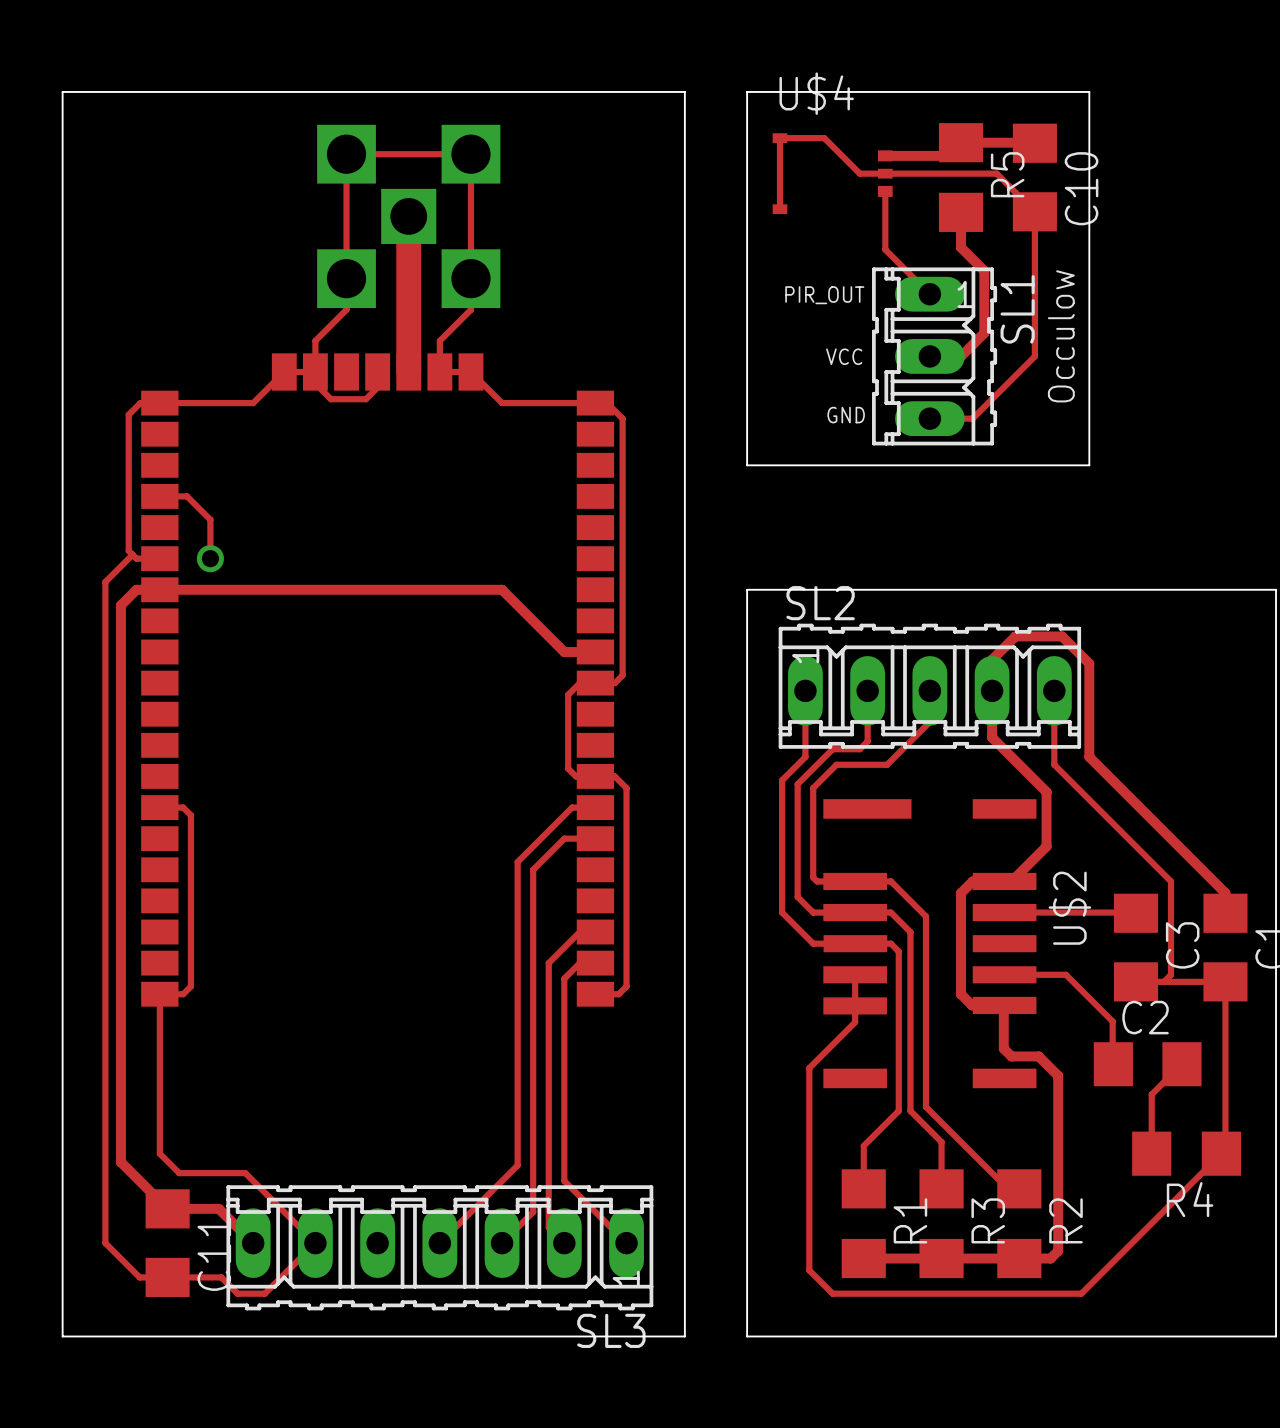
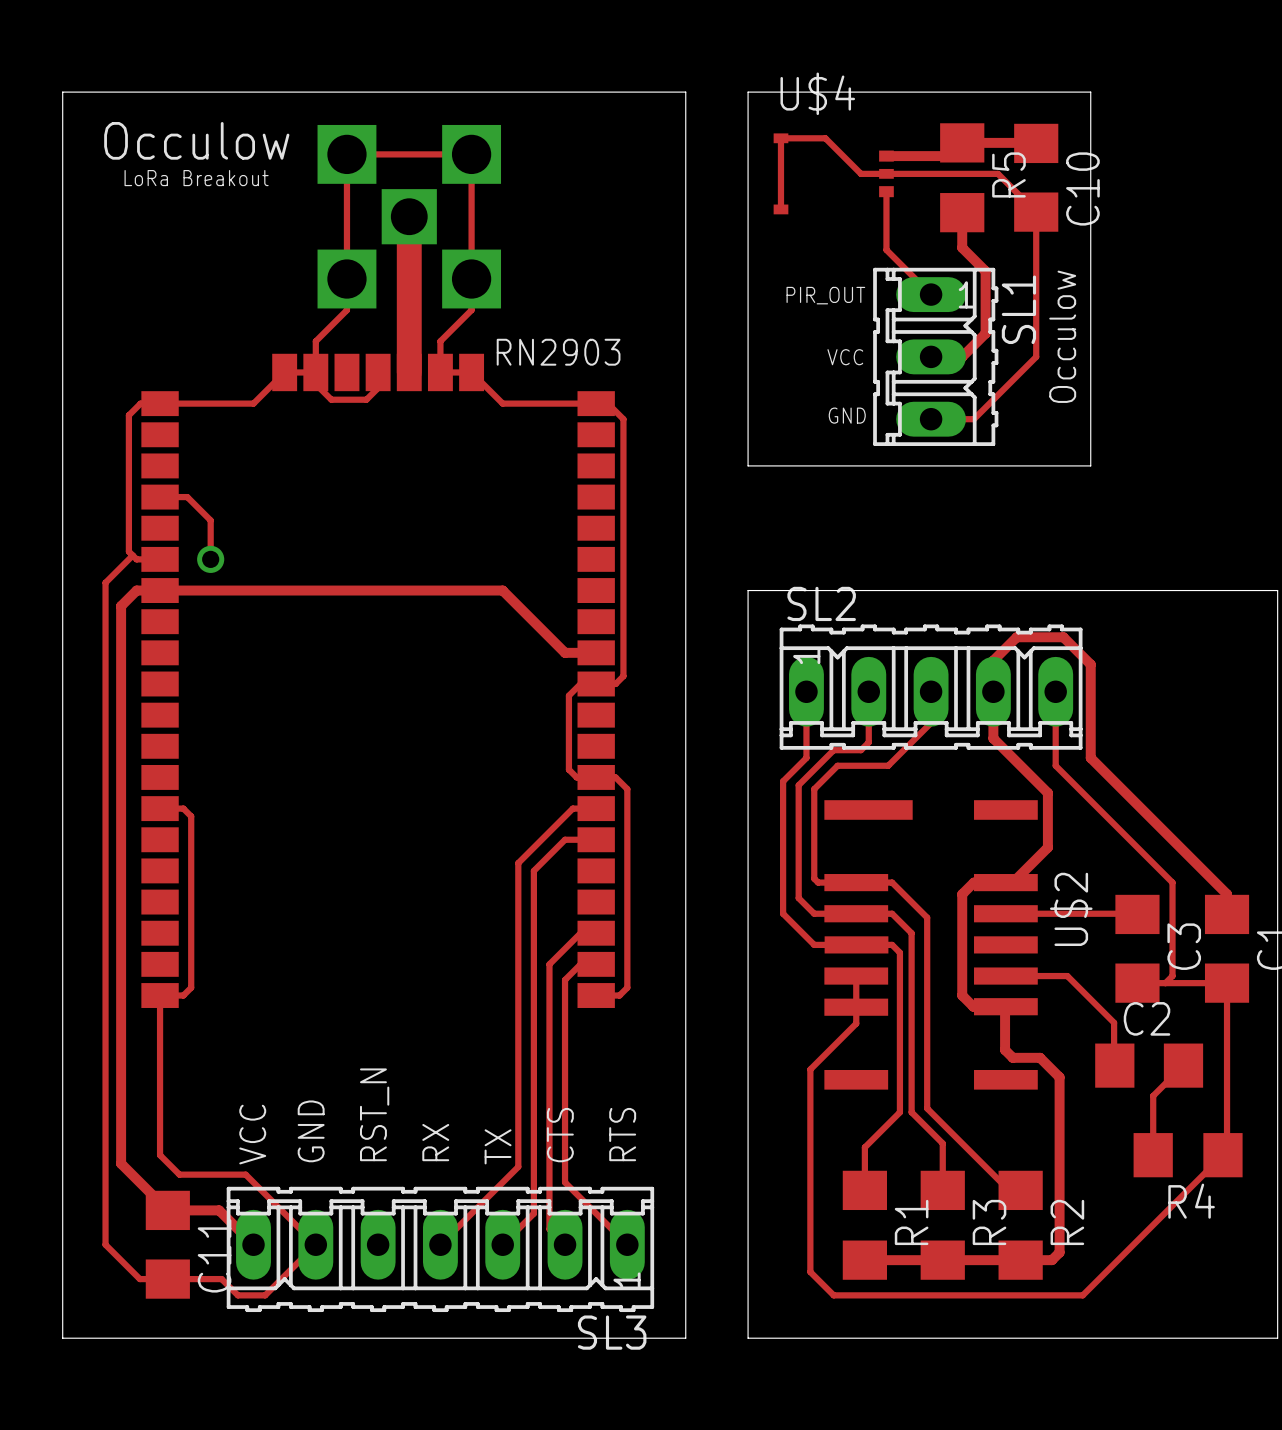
text: none -> Occulow (196, 140)
text: none -> LoRa Breakout (196, 178)
text: none -> RN2903 (558, 352)
text: none -> RST_N (374, 1114)
text: none -> GND (311, 1131)
text: none -> VCC (252, 1134)
text: none -> CTS (560, 1135)
text: none -> RTS (622, 1134)
text: none -> RX (435, 1142)
text: none -> TX (498, 1146)

